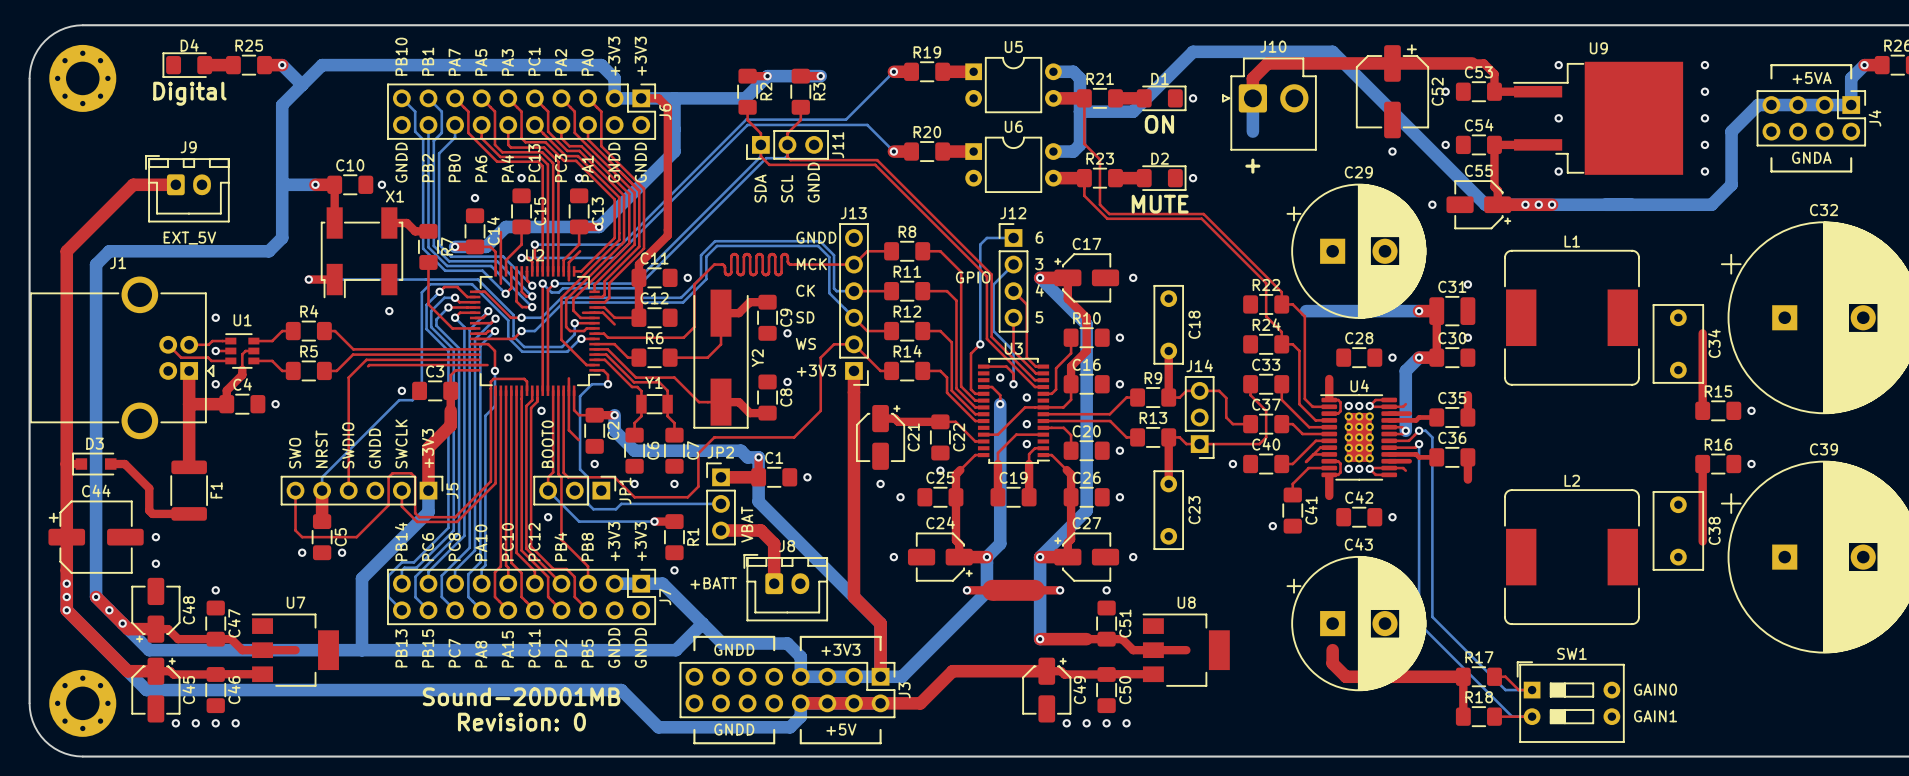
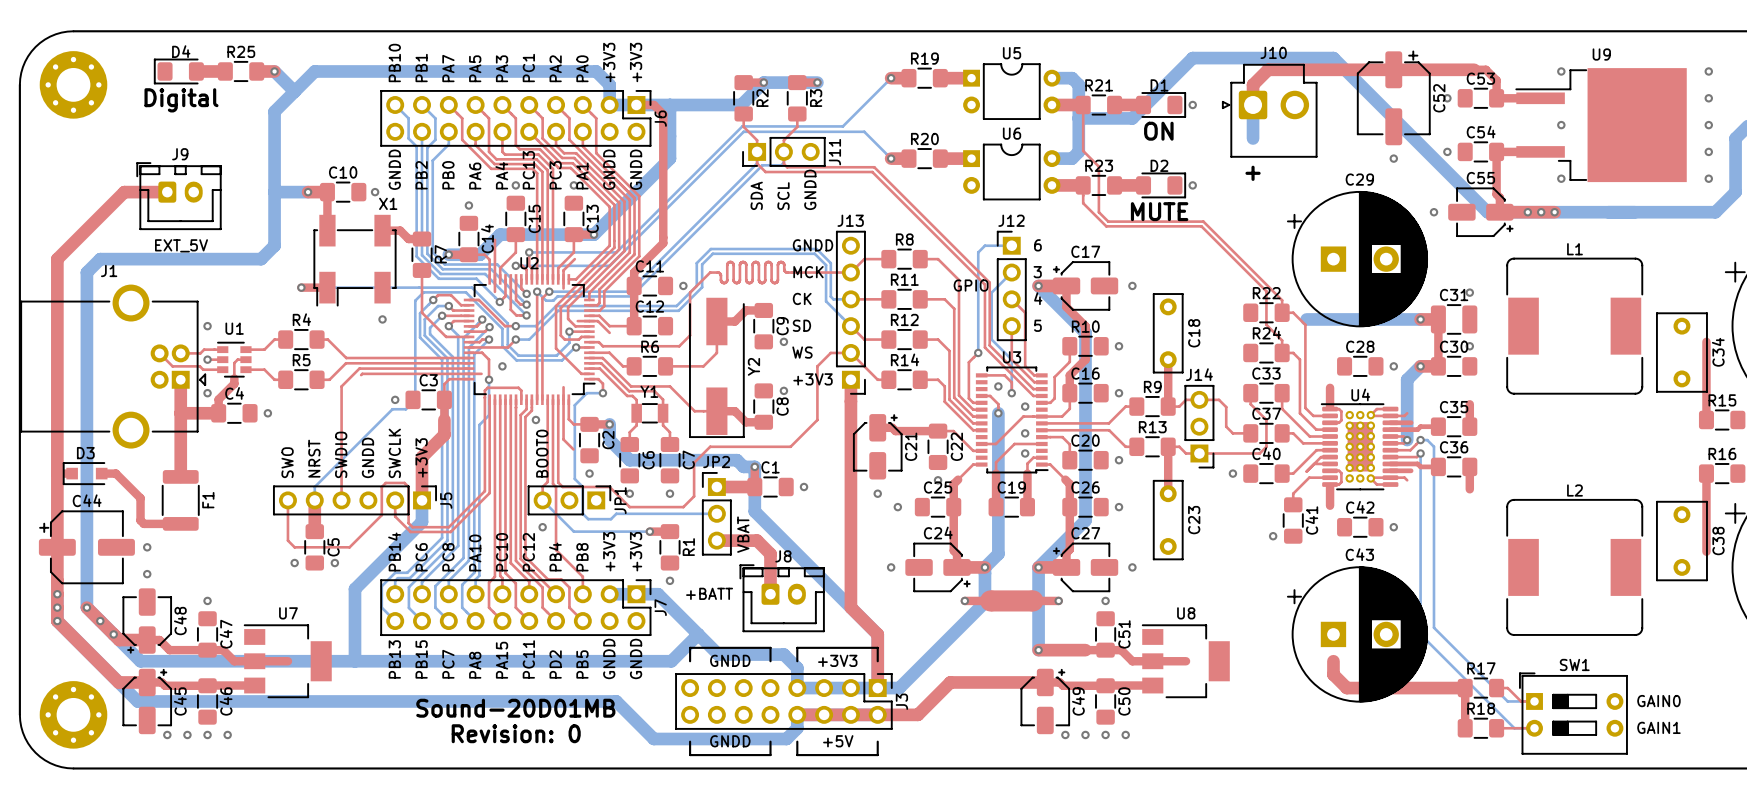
U4 footprint: [1320, 394, 1398, 481] -> [1321, 403, 1399, 491]
via: (1348, 406) -> none
via: (1359, 406) -> none
via: (1369, 406) -> none
via: (1348, 468) -> none
via: (1359, 468) -> none
via: (1369, 468) -> none

